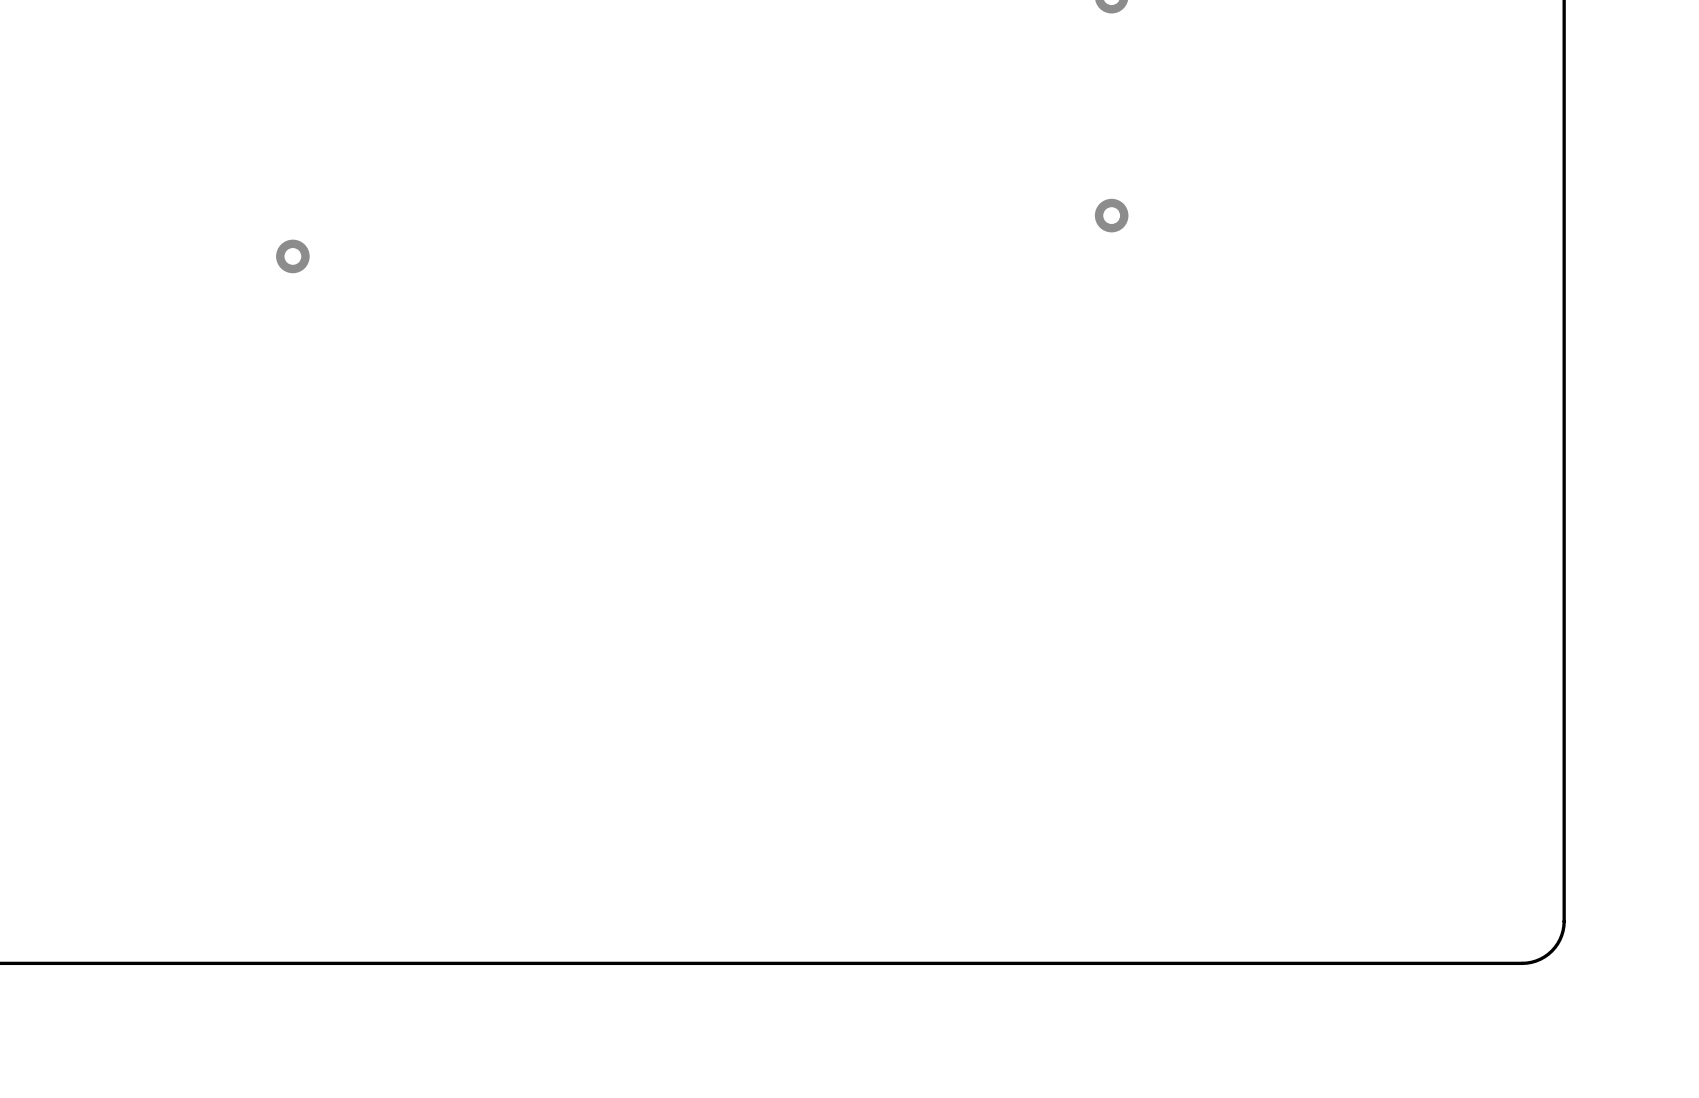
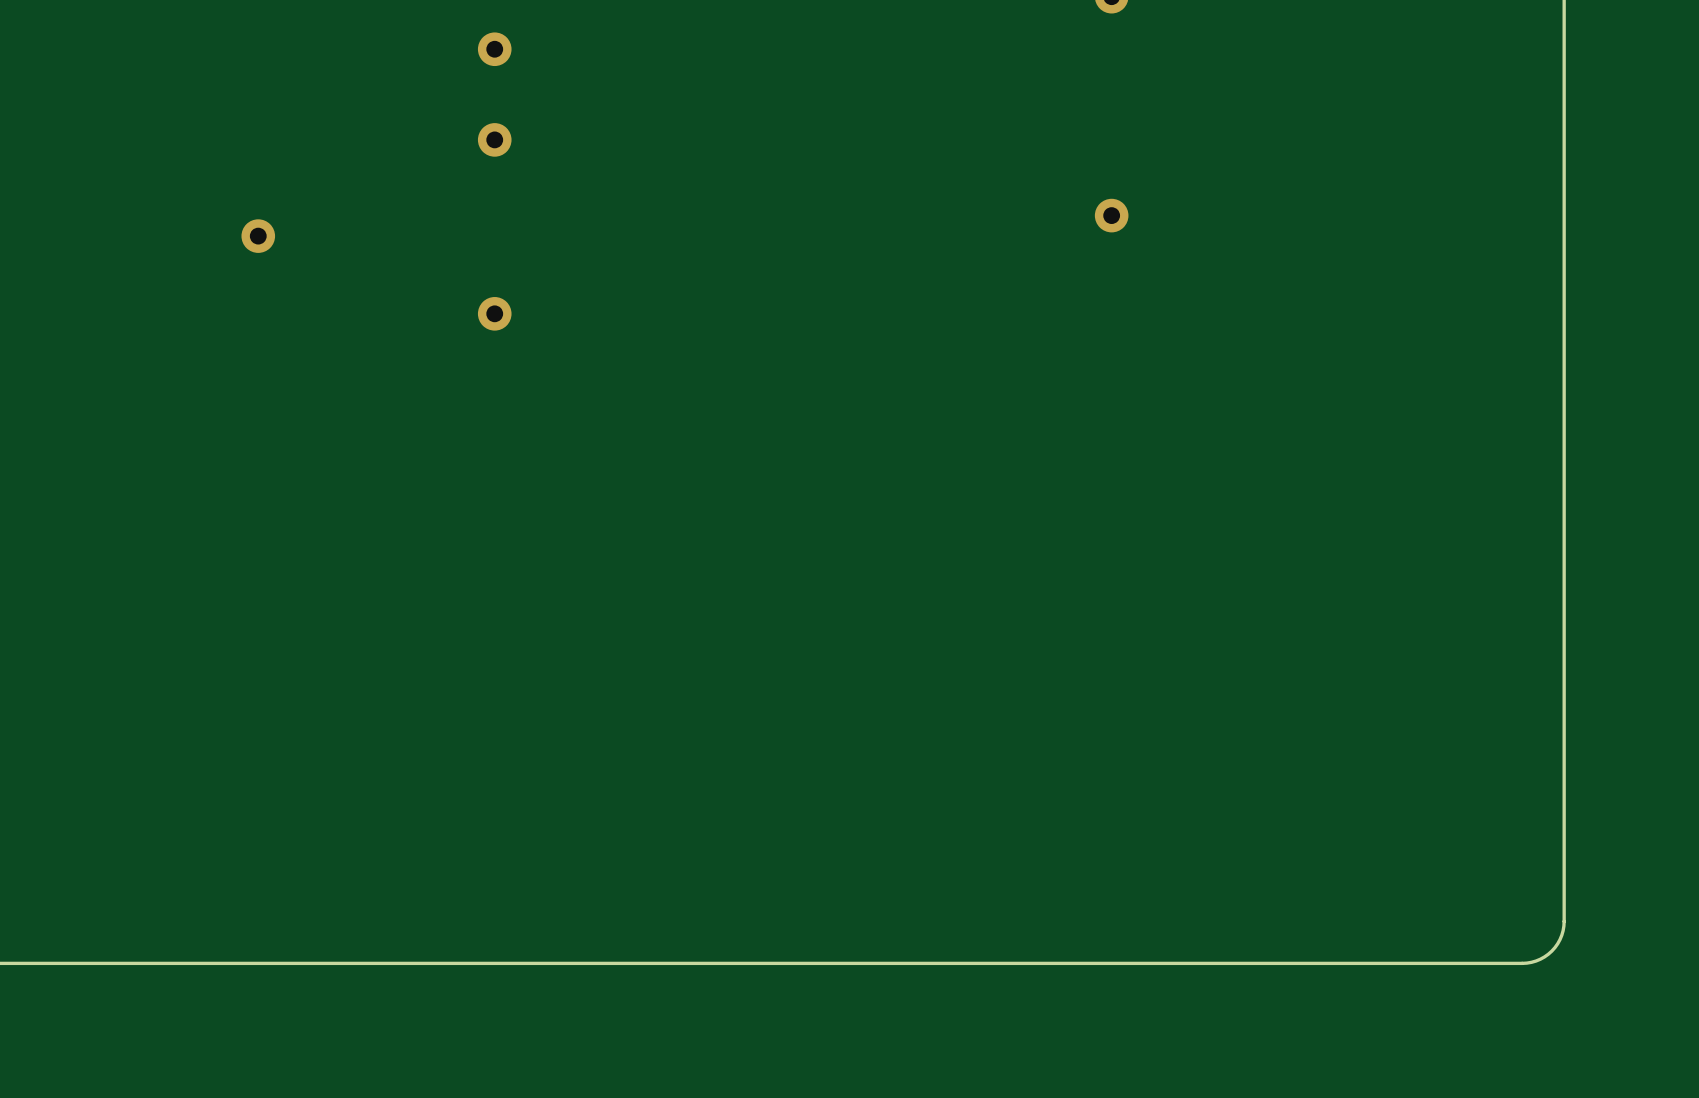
via: none -> (494, 49)
via: none -> (494, 139)
via position: (292, 256) -> (258, 236)
via: none -> (494, 313)

